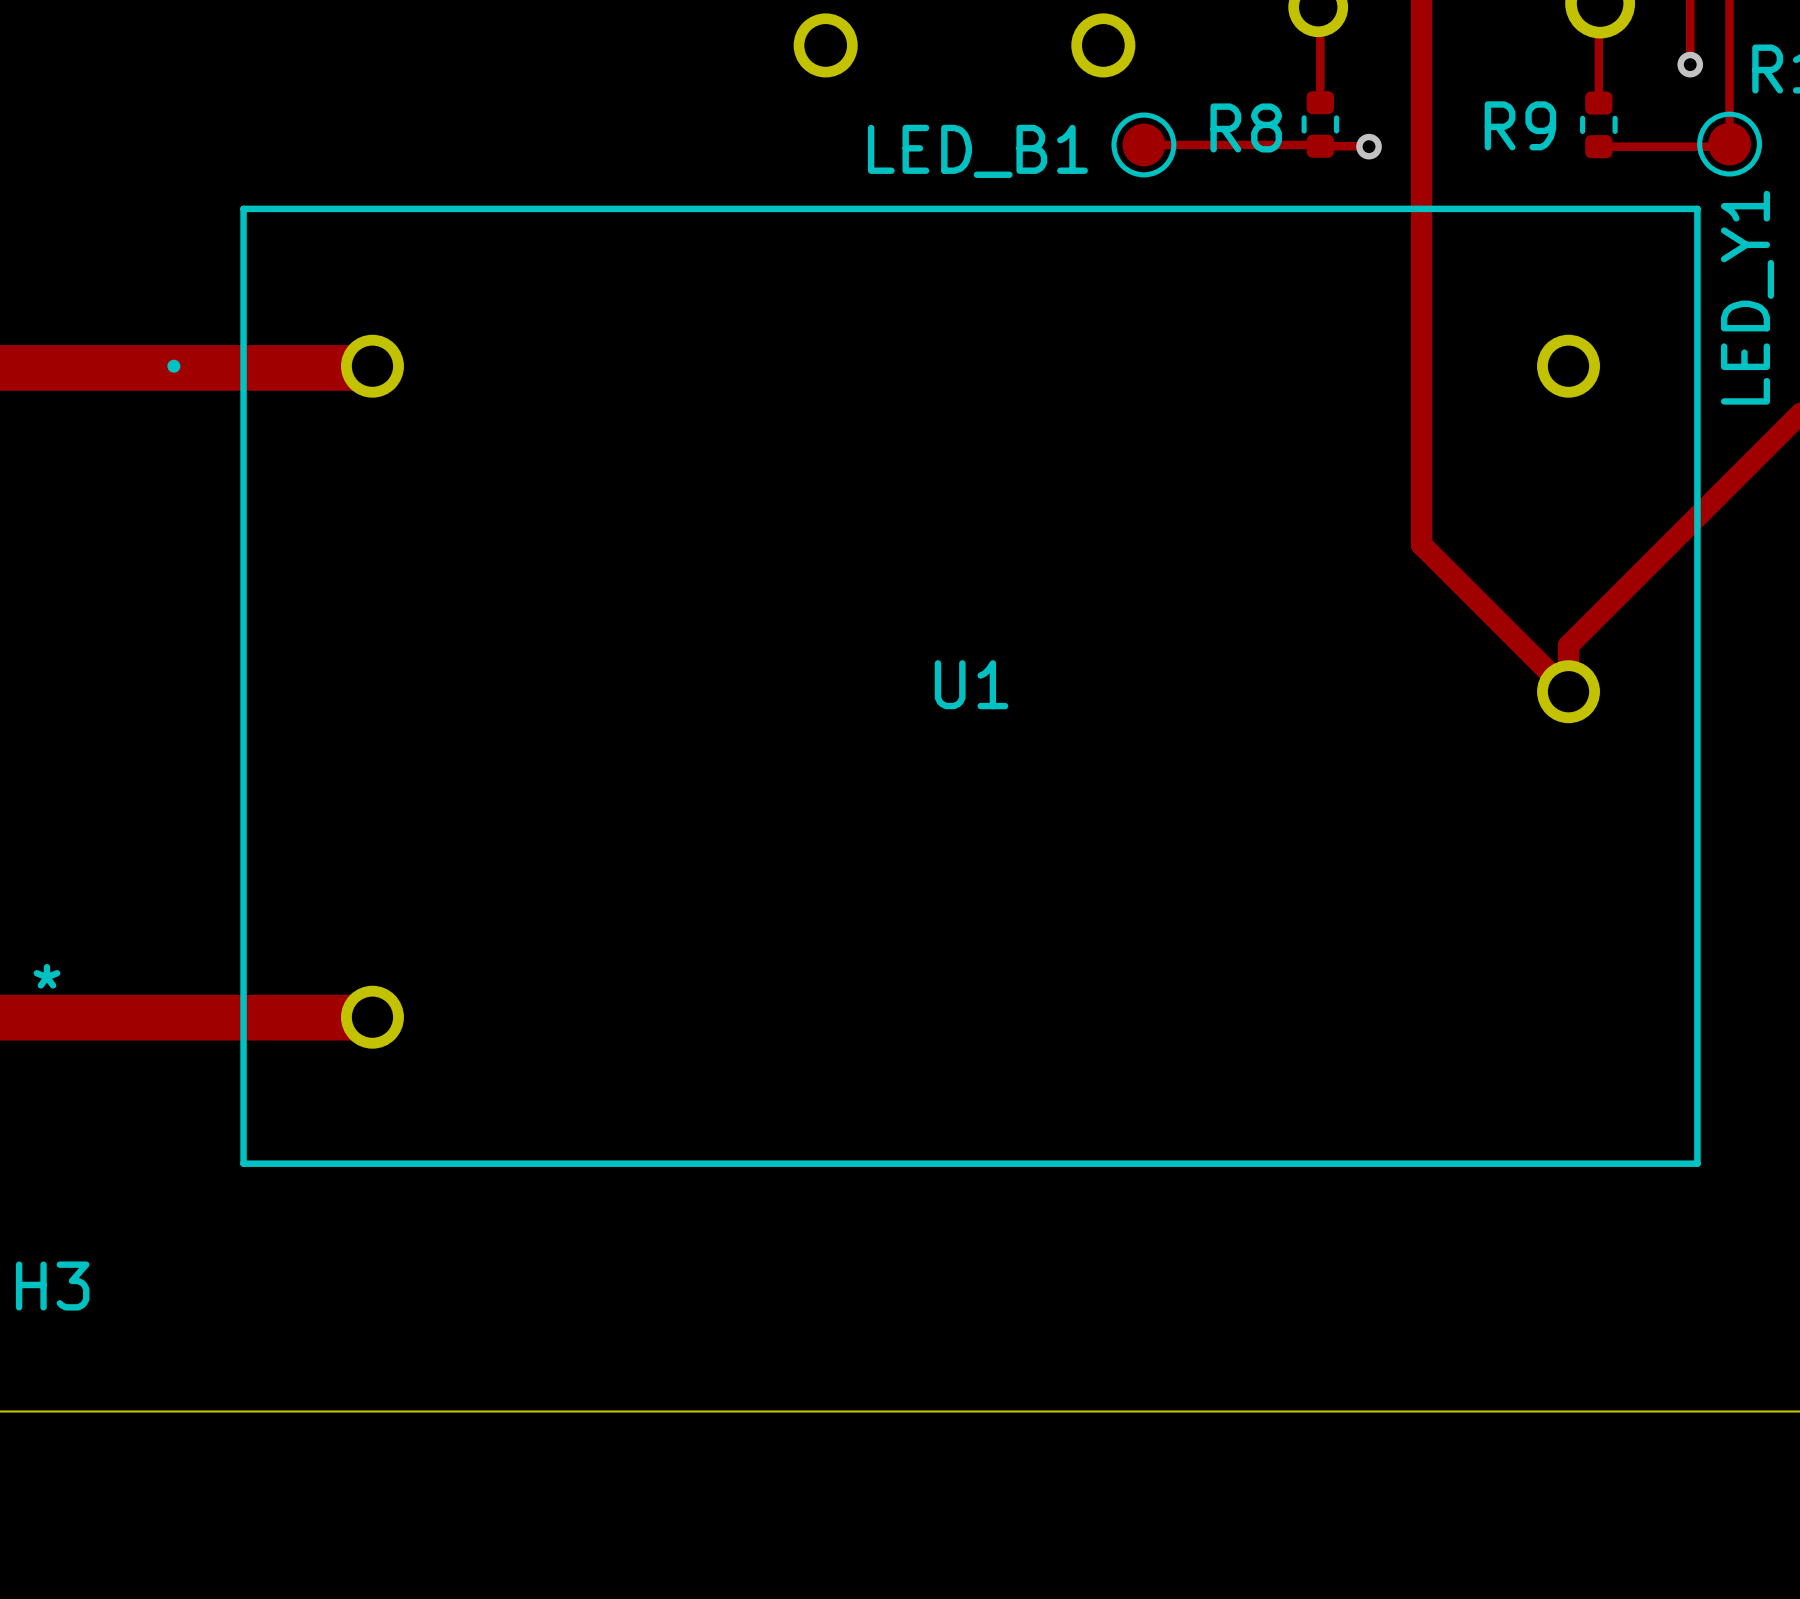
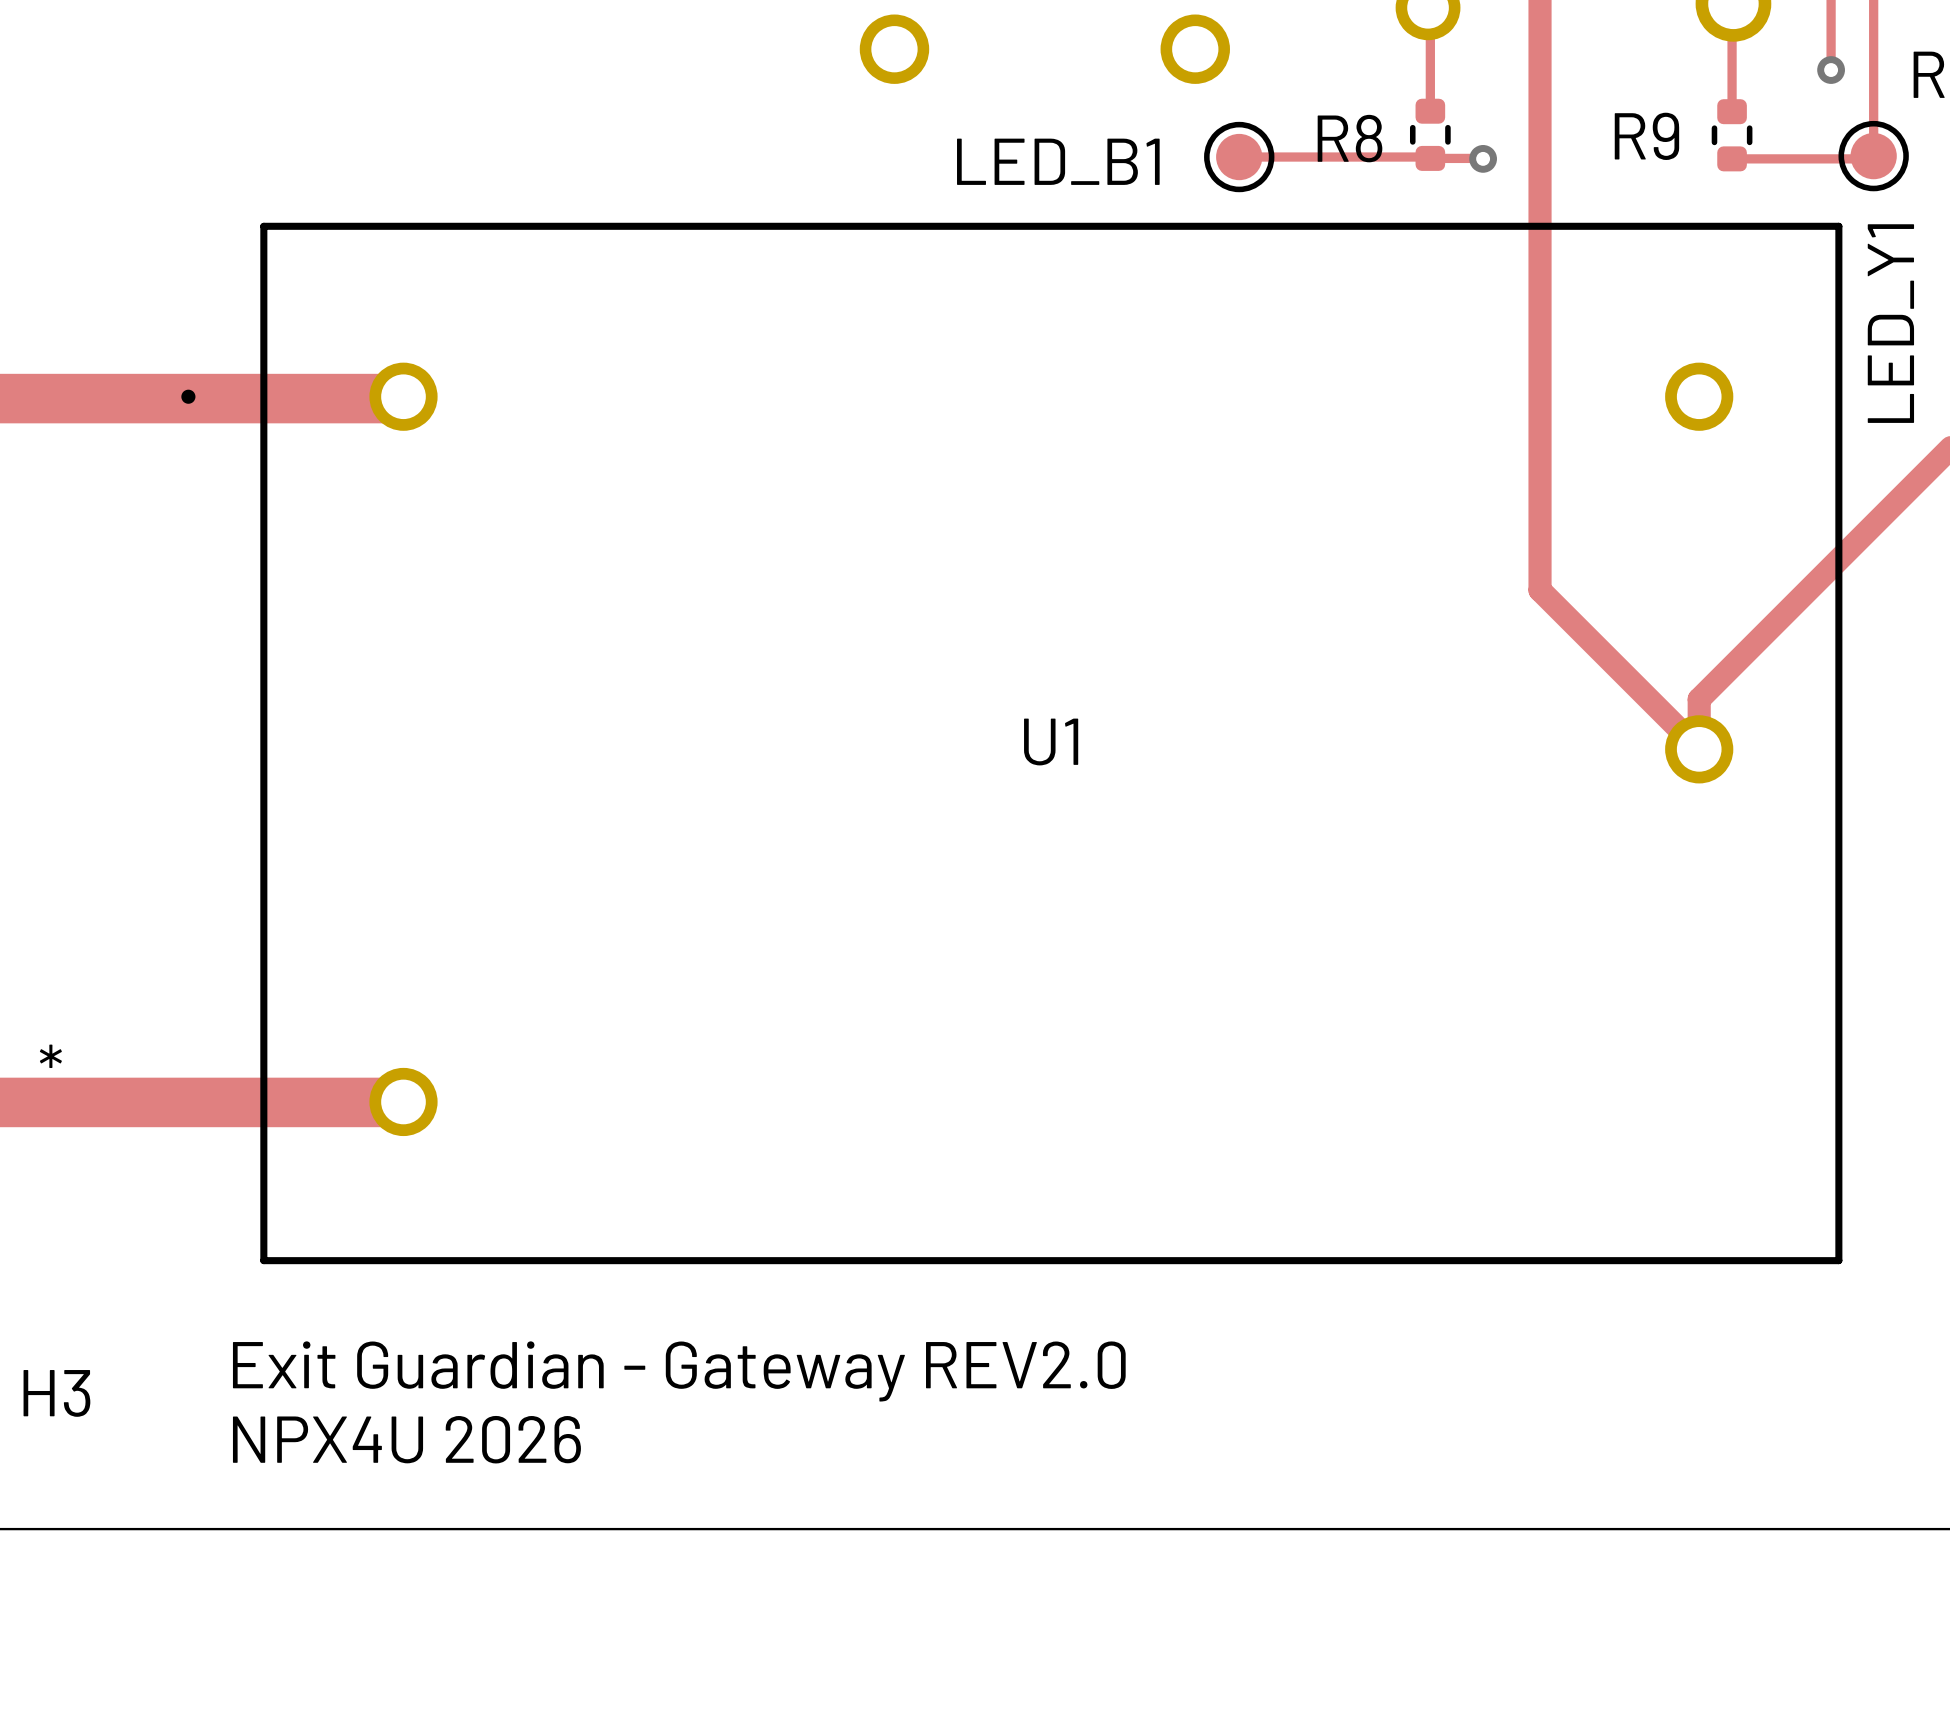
text: none -> Exit Guardian - Gateway REV2.0 (679, 1371)
text: none -> NPX4U 2026 (406, 1439)

